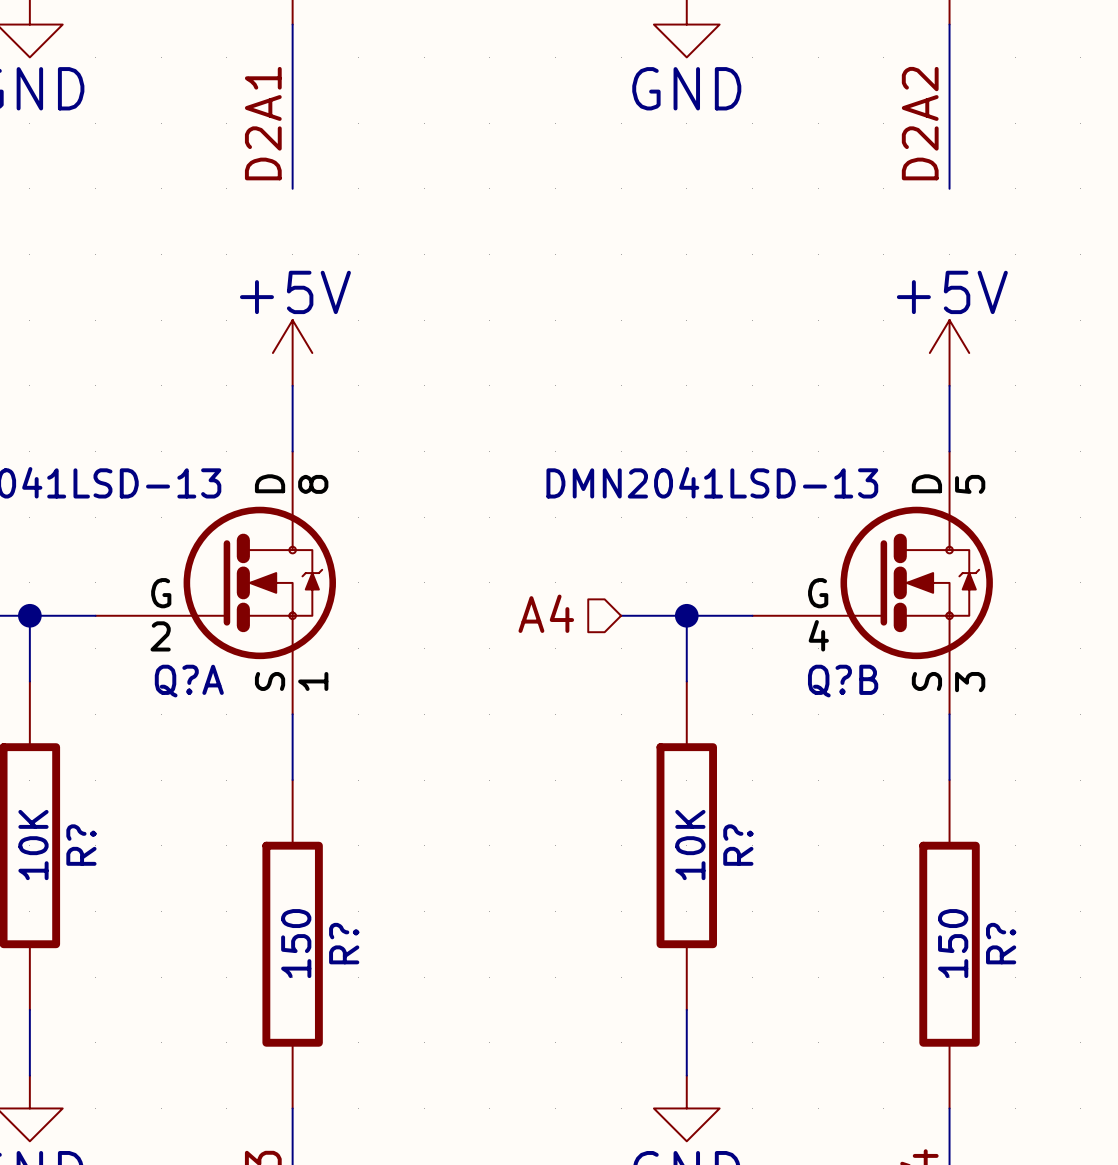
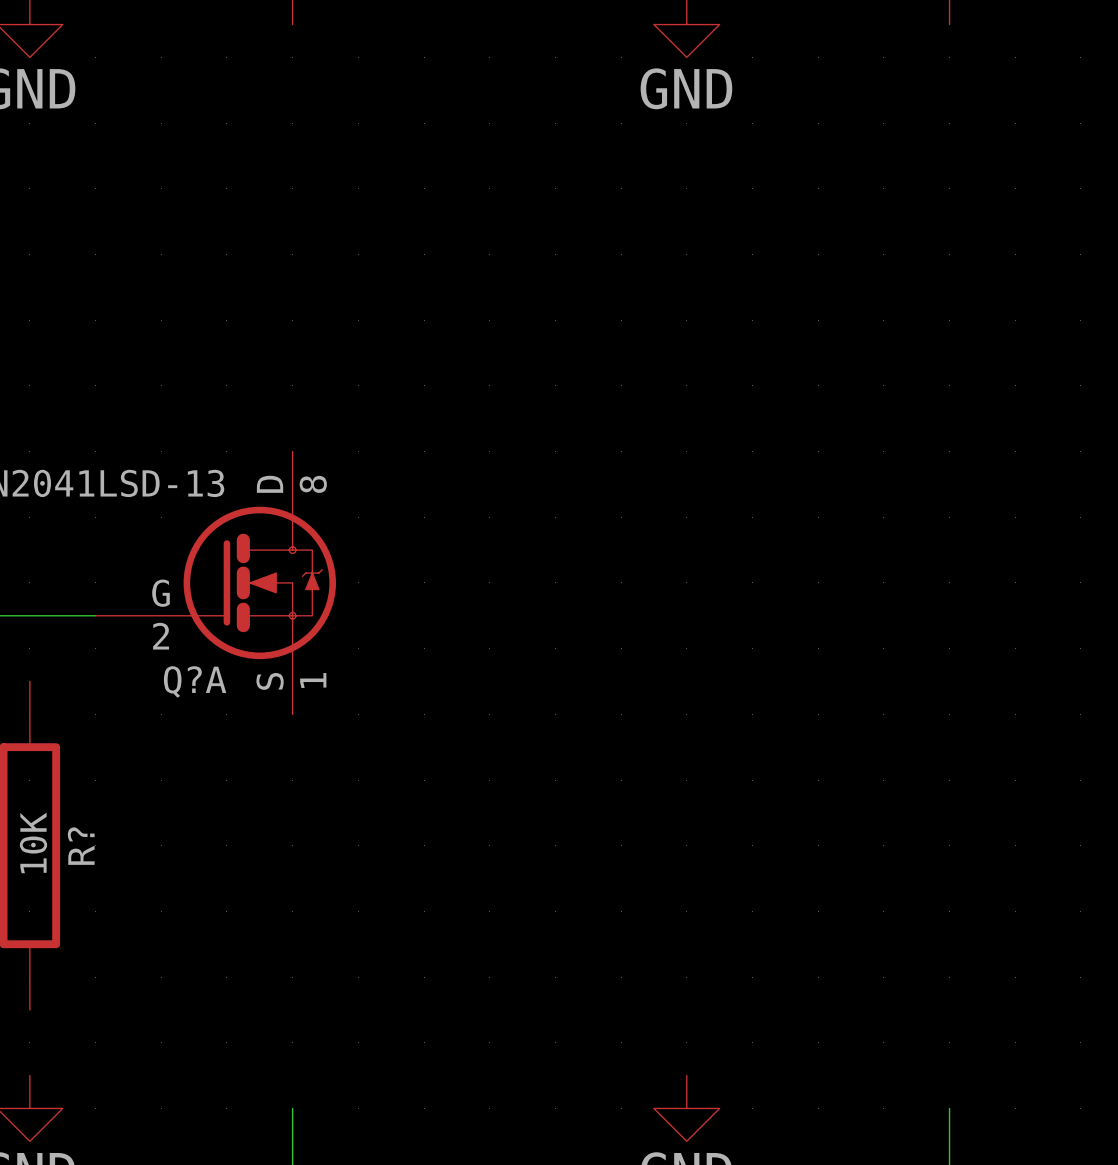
wire: (292, 24) (292, 188) -> none
wire: (949, 24) (949, 188) -> none
label: D2A1 (263, 123) -> none
label: D2A2 (920, 123) -> none
power symbol: +5V (292, 353) -> none
power symbol: +5V (949, 353) -> none
wire: (292, 385) (292, 451) -> none
wire: (949, 385) (949, 451) -> none
Q?B: DMN2041LSD-13 (872, 582) -> none
hierarchical label: A4 (546, 613) -> none
wire: (29, 615) (29, 681) -> none
junction: (29, 615) -> none
wire: (621, 615) (752, 615) -> none
wire: (686, 615) (686, 681) -> none
junction: (686, 615) -> none
wire: (292, 714) (292, 780) -> none
wire: (949, 714) (949, 780) -> none
R?: 10K (686, 845) -> none
R?: 150 (292, 944) -> none
R?: 150 (949, 944) -> none
wire: (29, 1009) (29, 1075) -> none
wire: (686, 1009) (686, 1075) -> none

